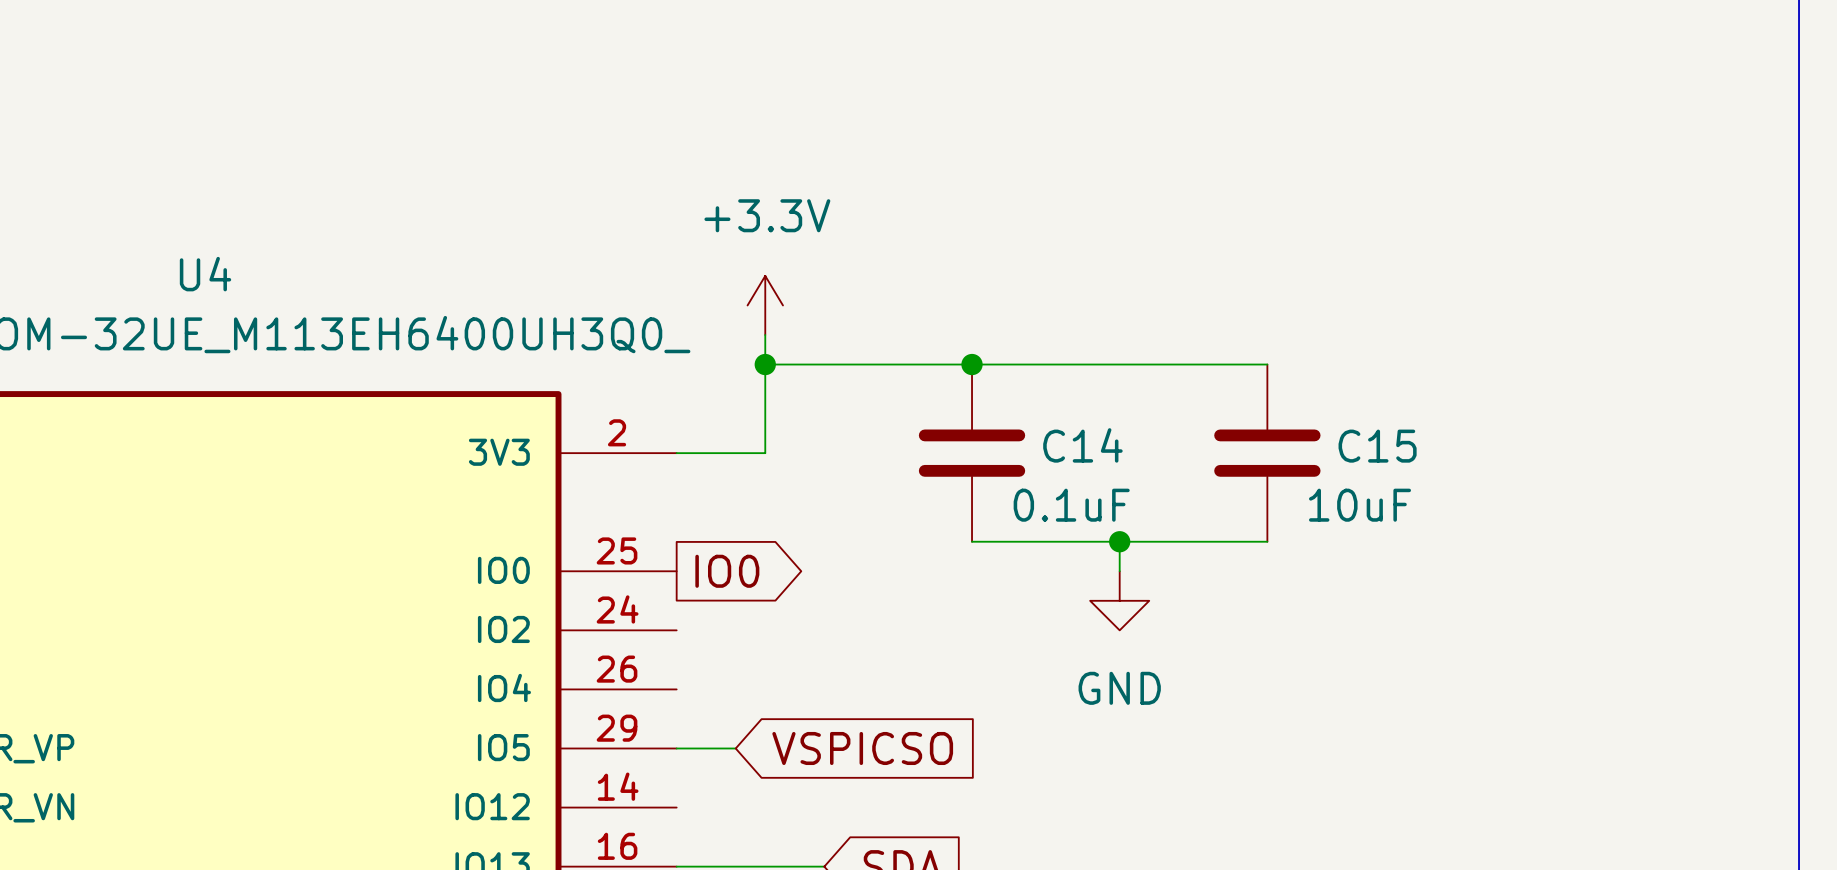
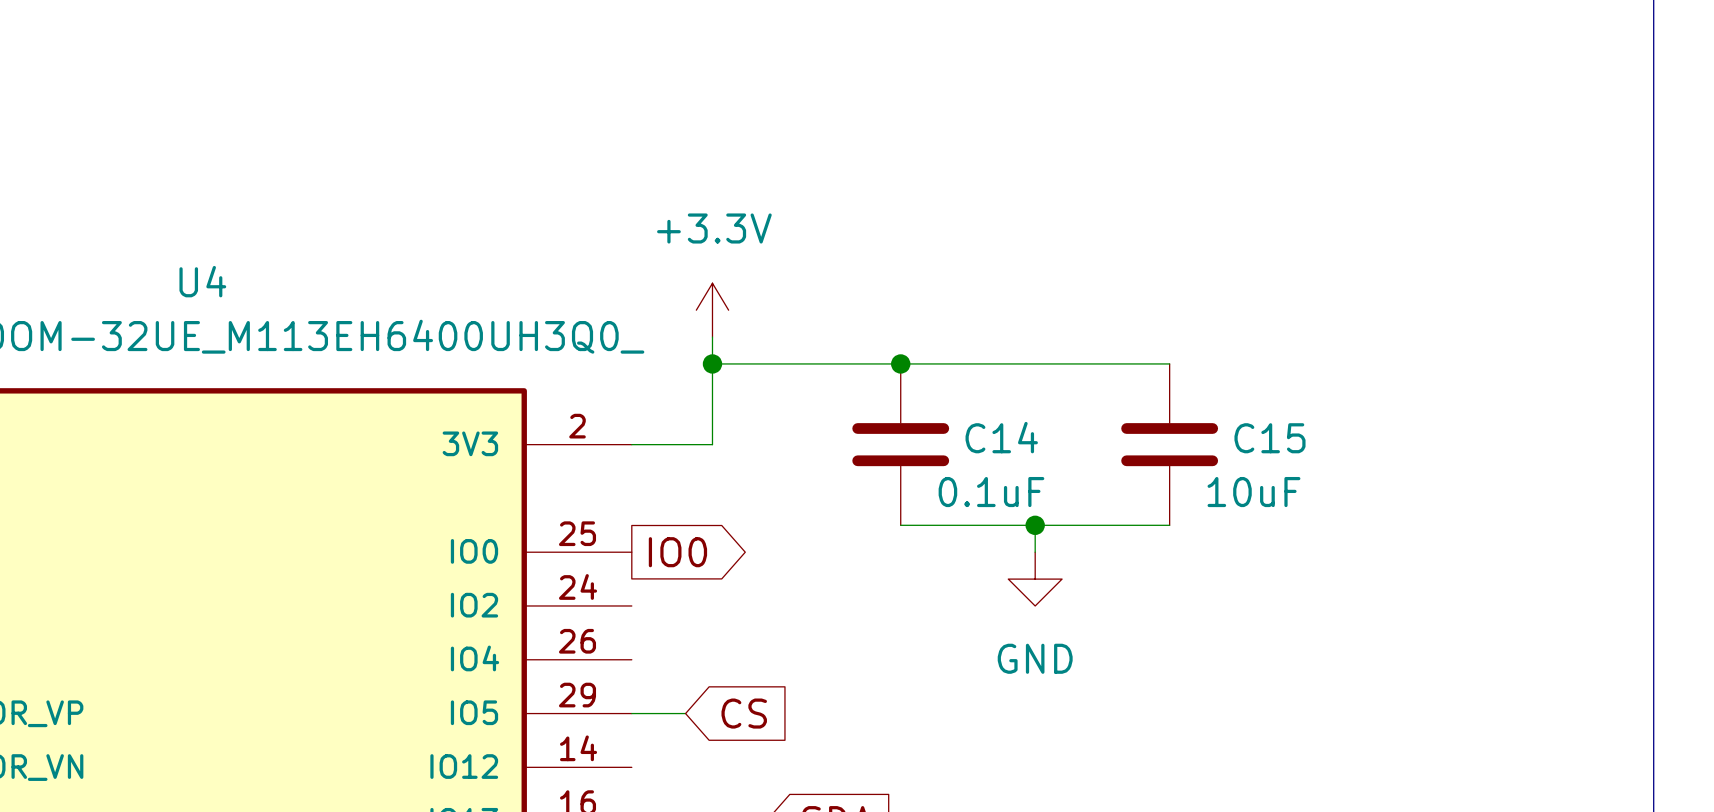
global label: VSPICSO (862, 748) -> CS (744, 713)

